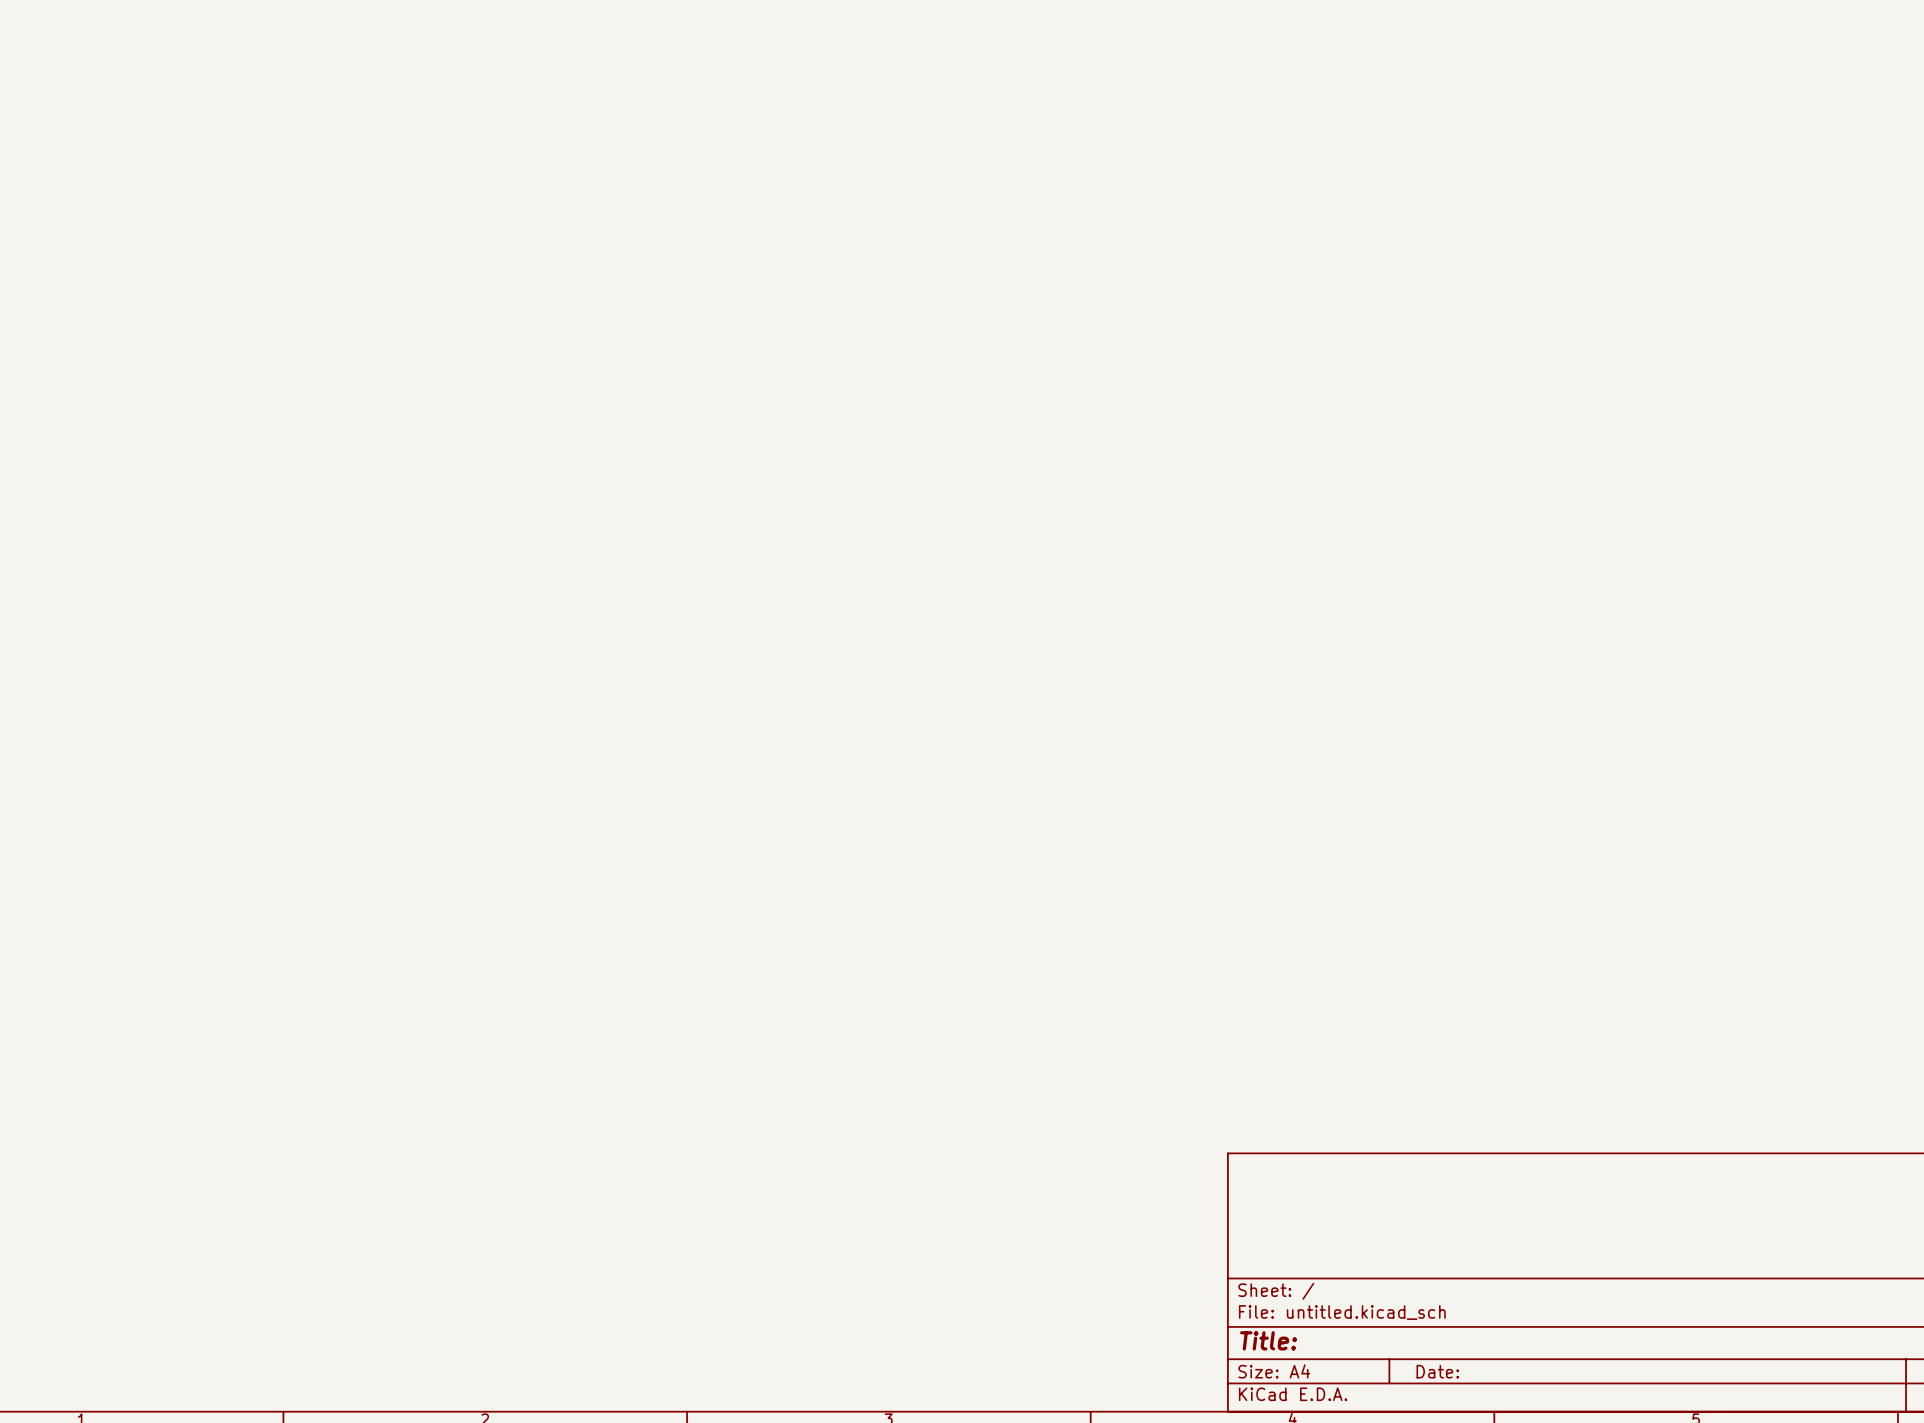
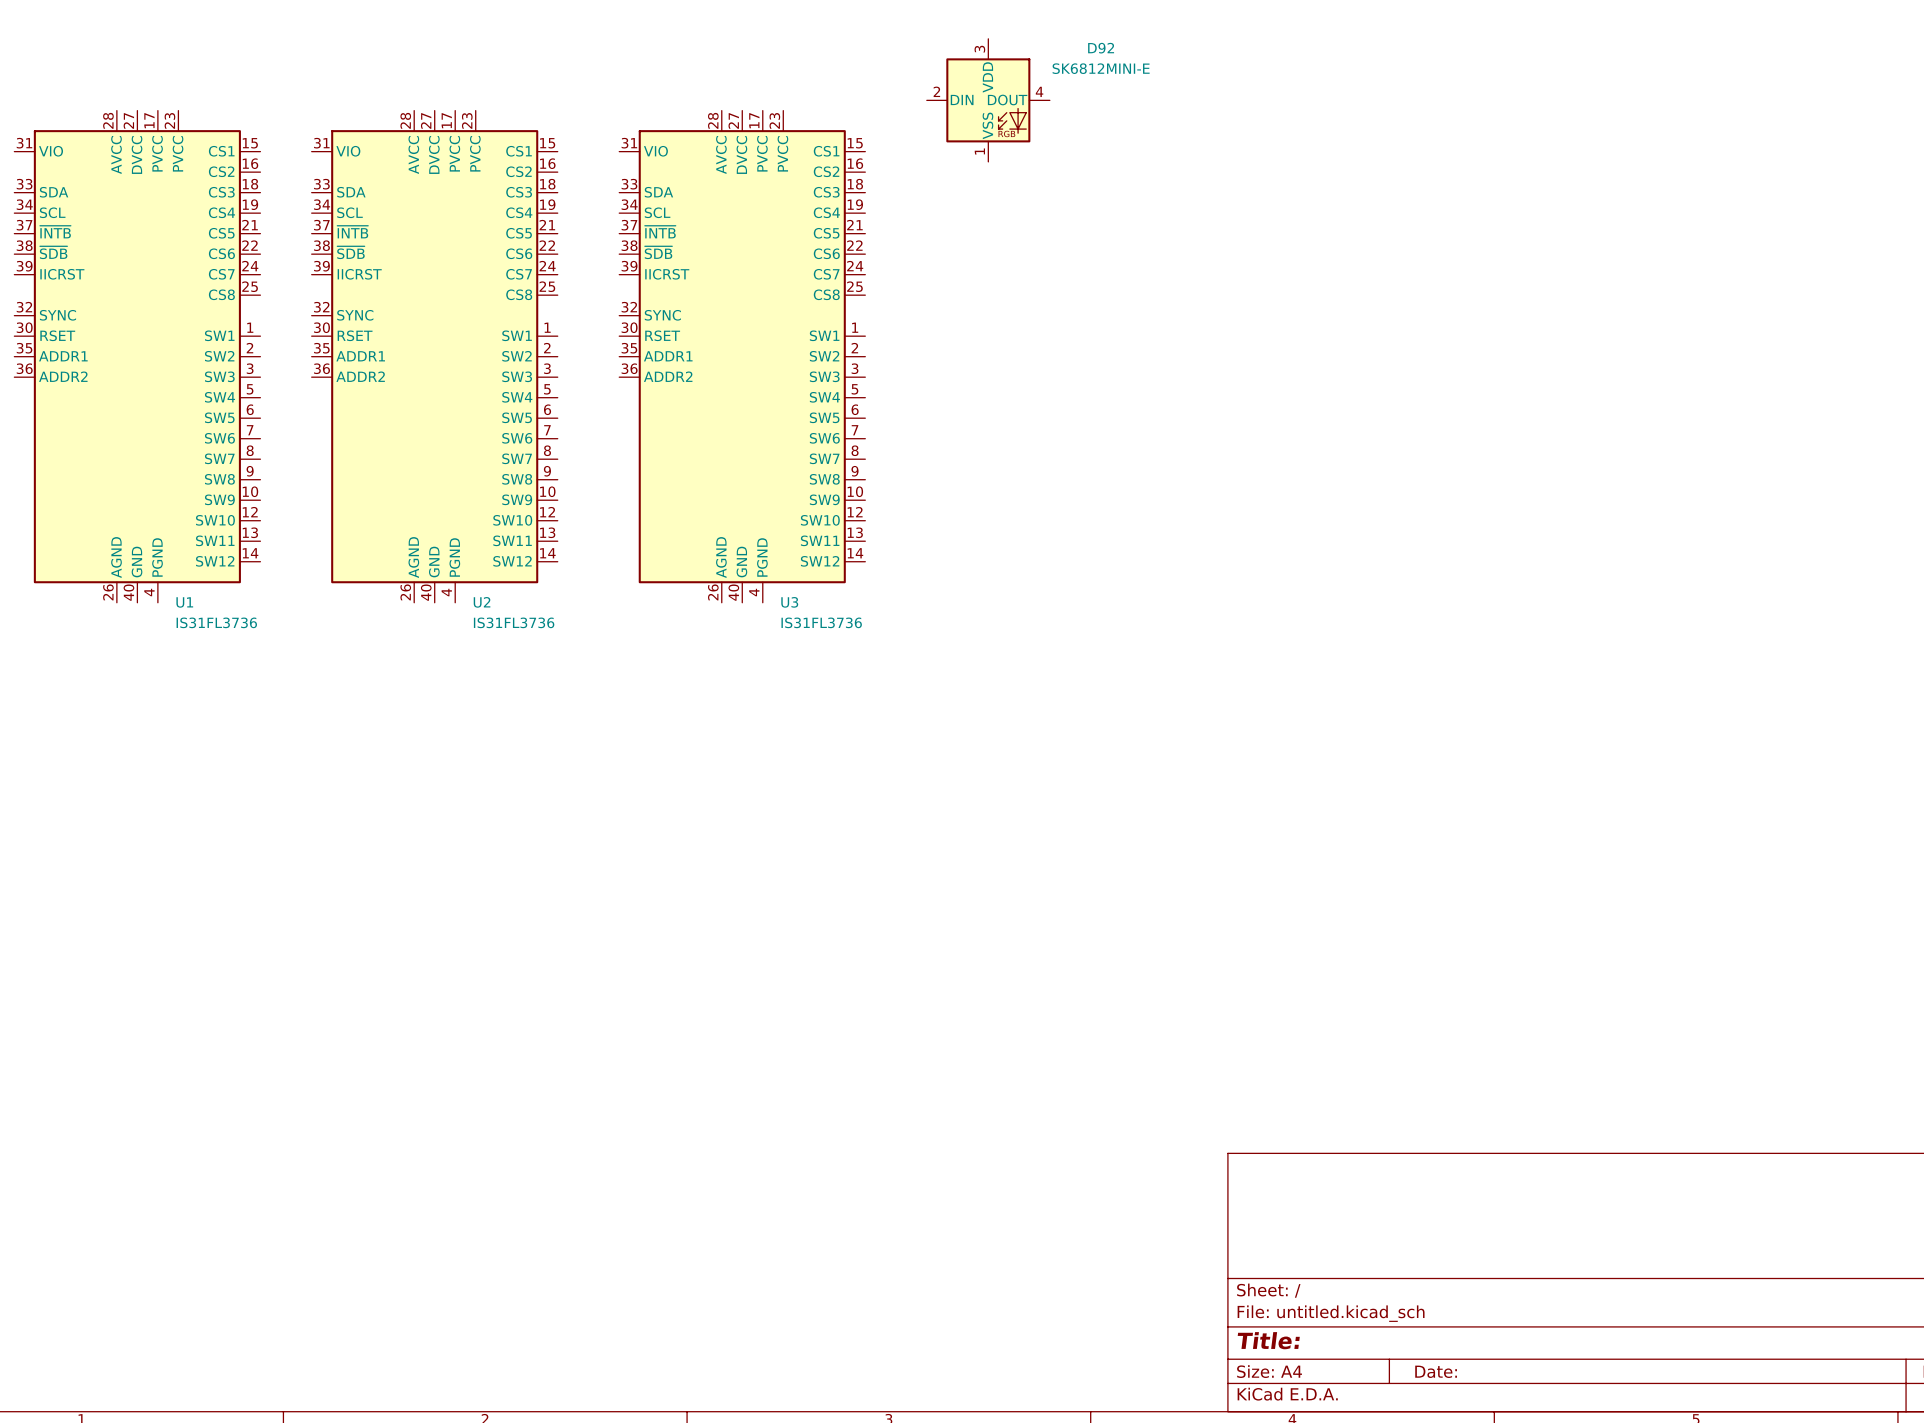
D92: none -> SK6812MINI-E (988, 100)
U1: none -> IS31FL3736 (137, 356)
U2: none -> IS31FL3736 (434, 356)
U3: none -> IS31FL3736 (742, 356)

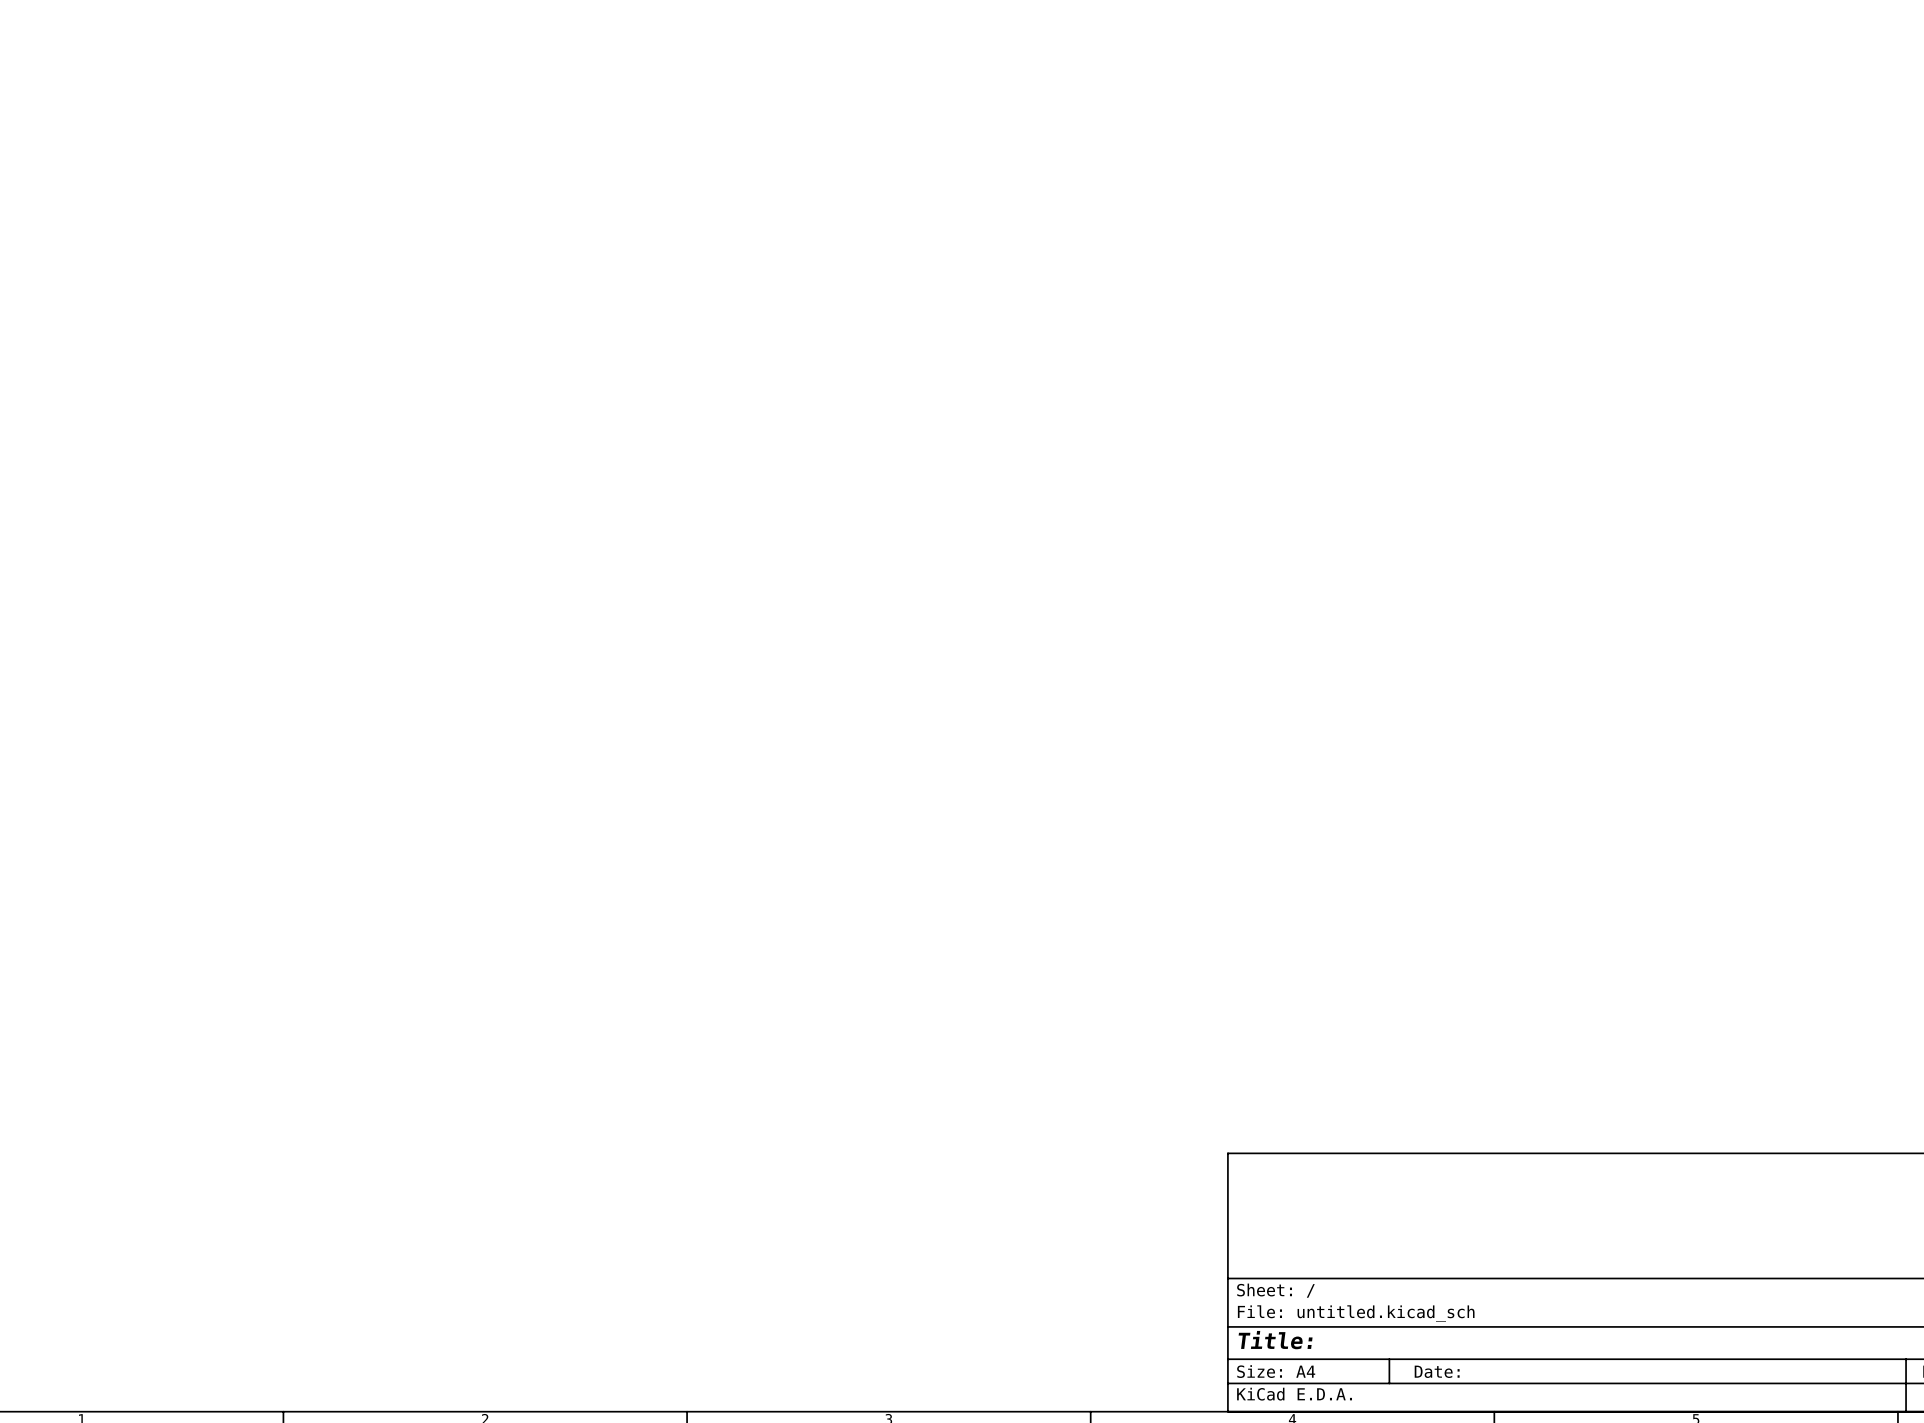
D92: SK6812MINI-E (988, 100) -> none
U1: IS31FL3736 (137, 356) -> none
U2: IS31FL3736 (434, 356) -> none
U3: IS31FL3736 (742, 356) -> none

